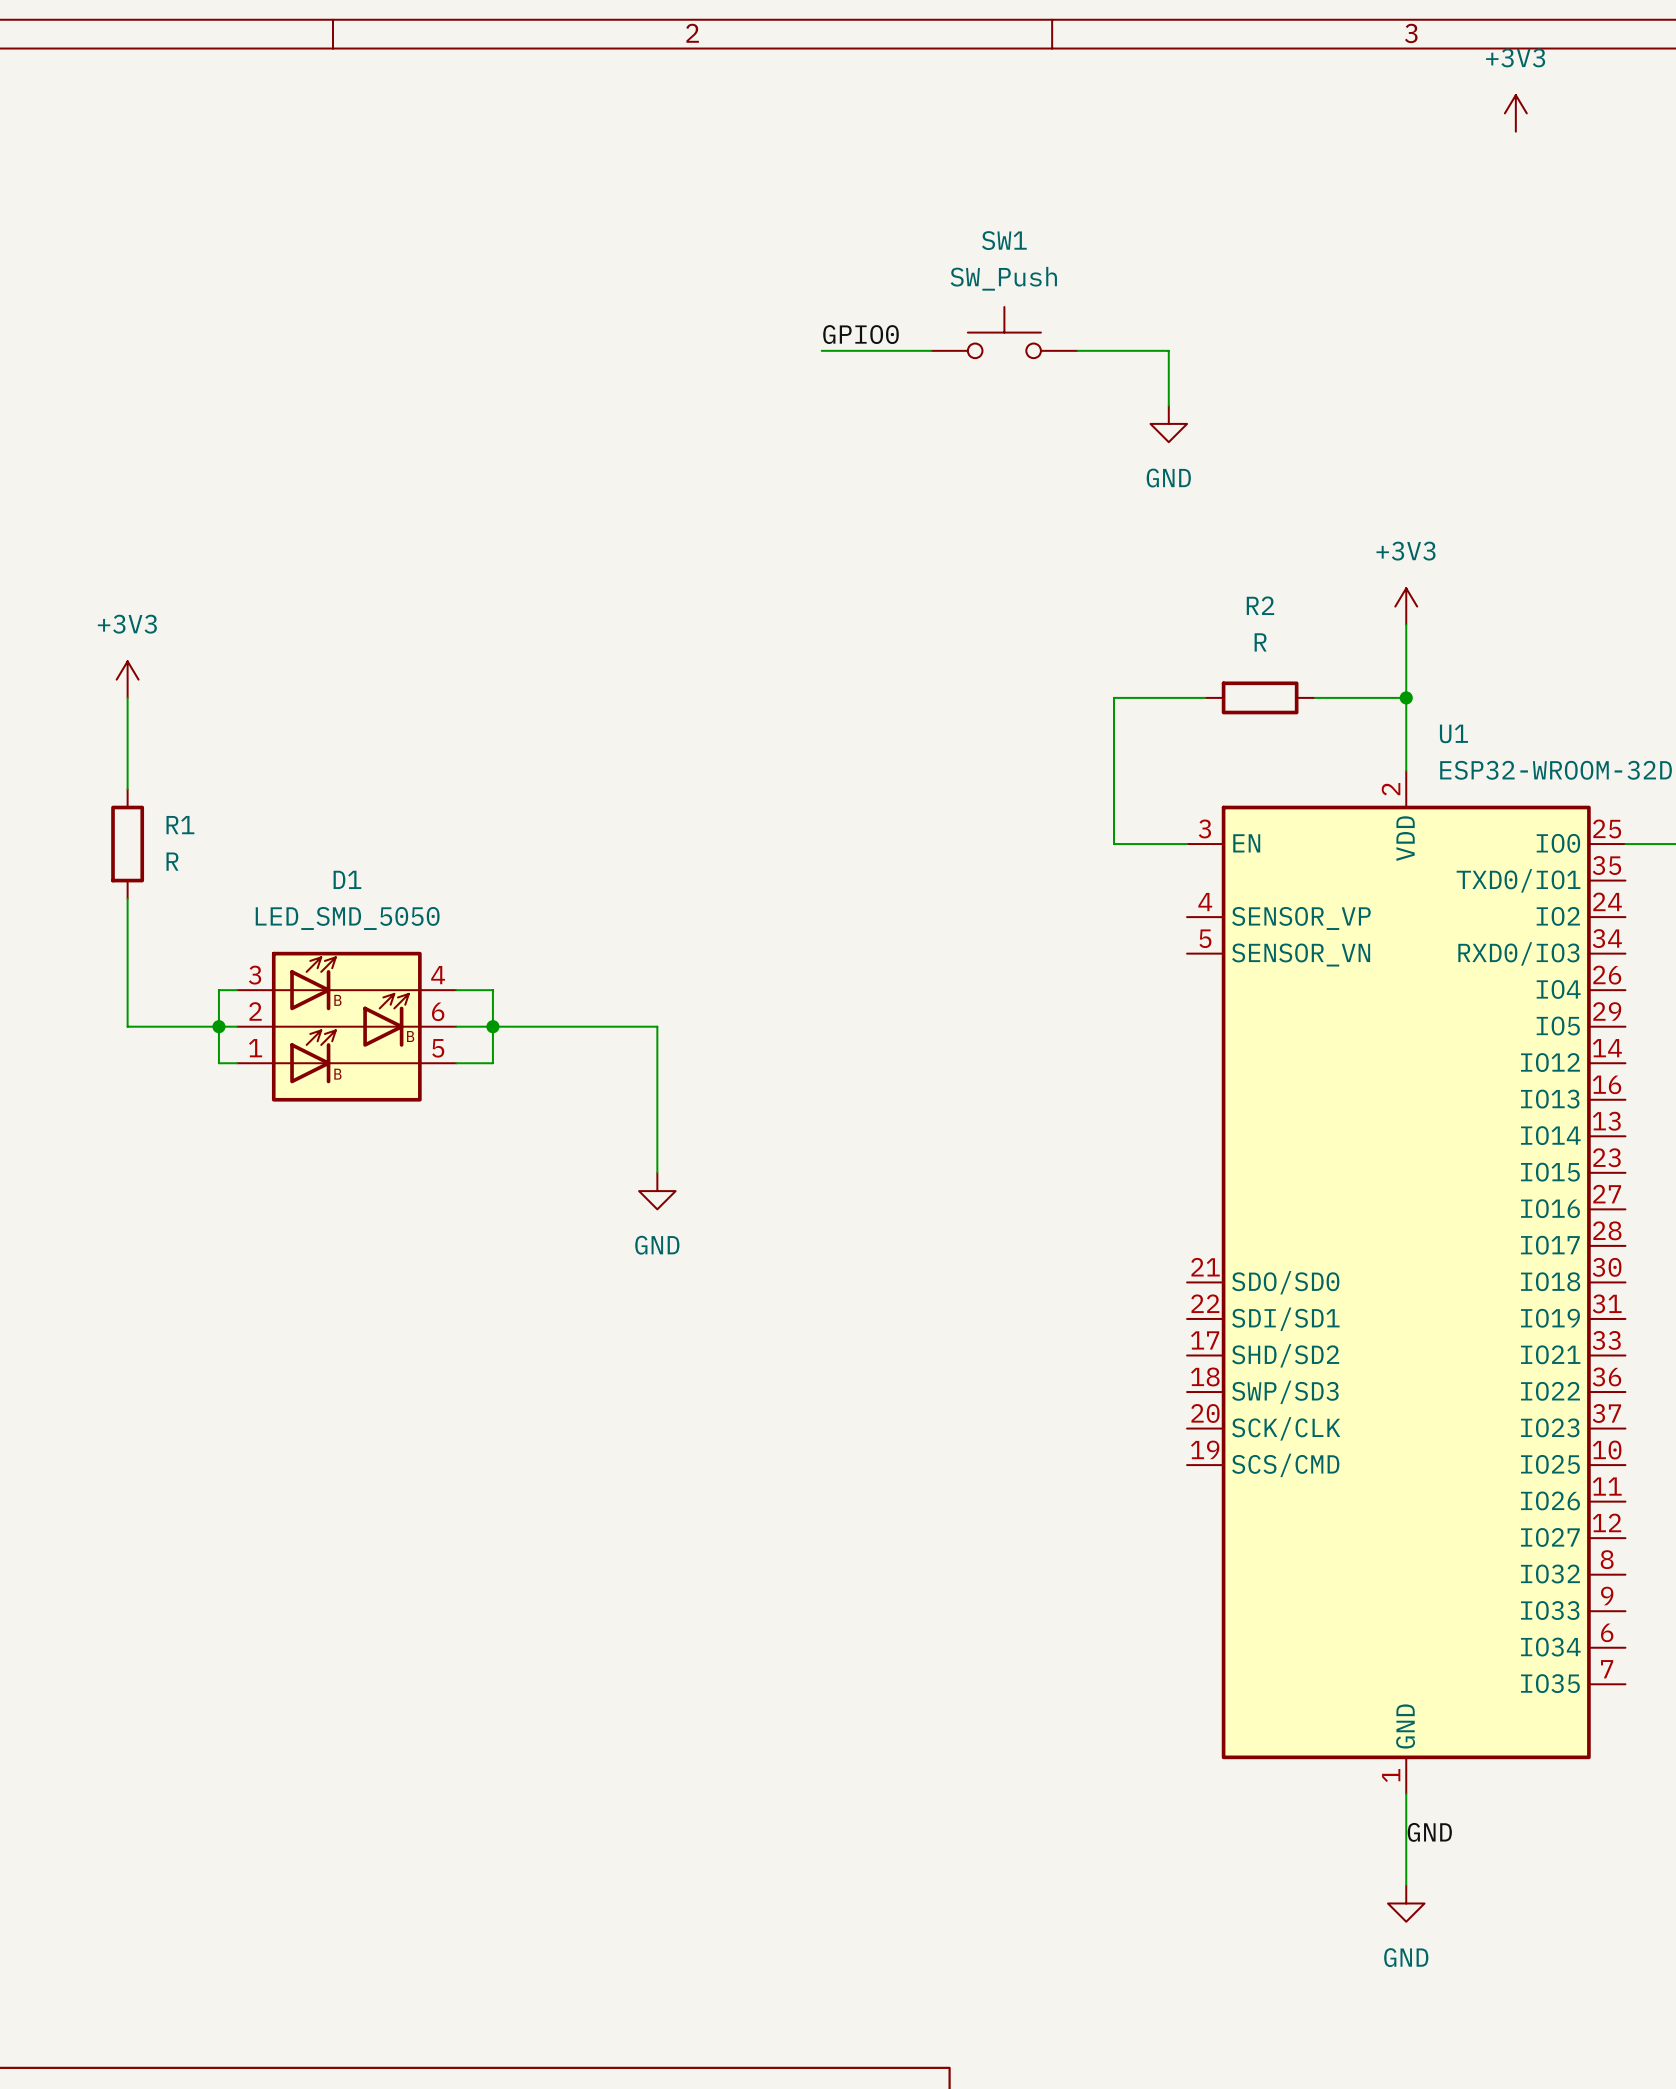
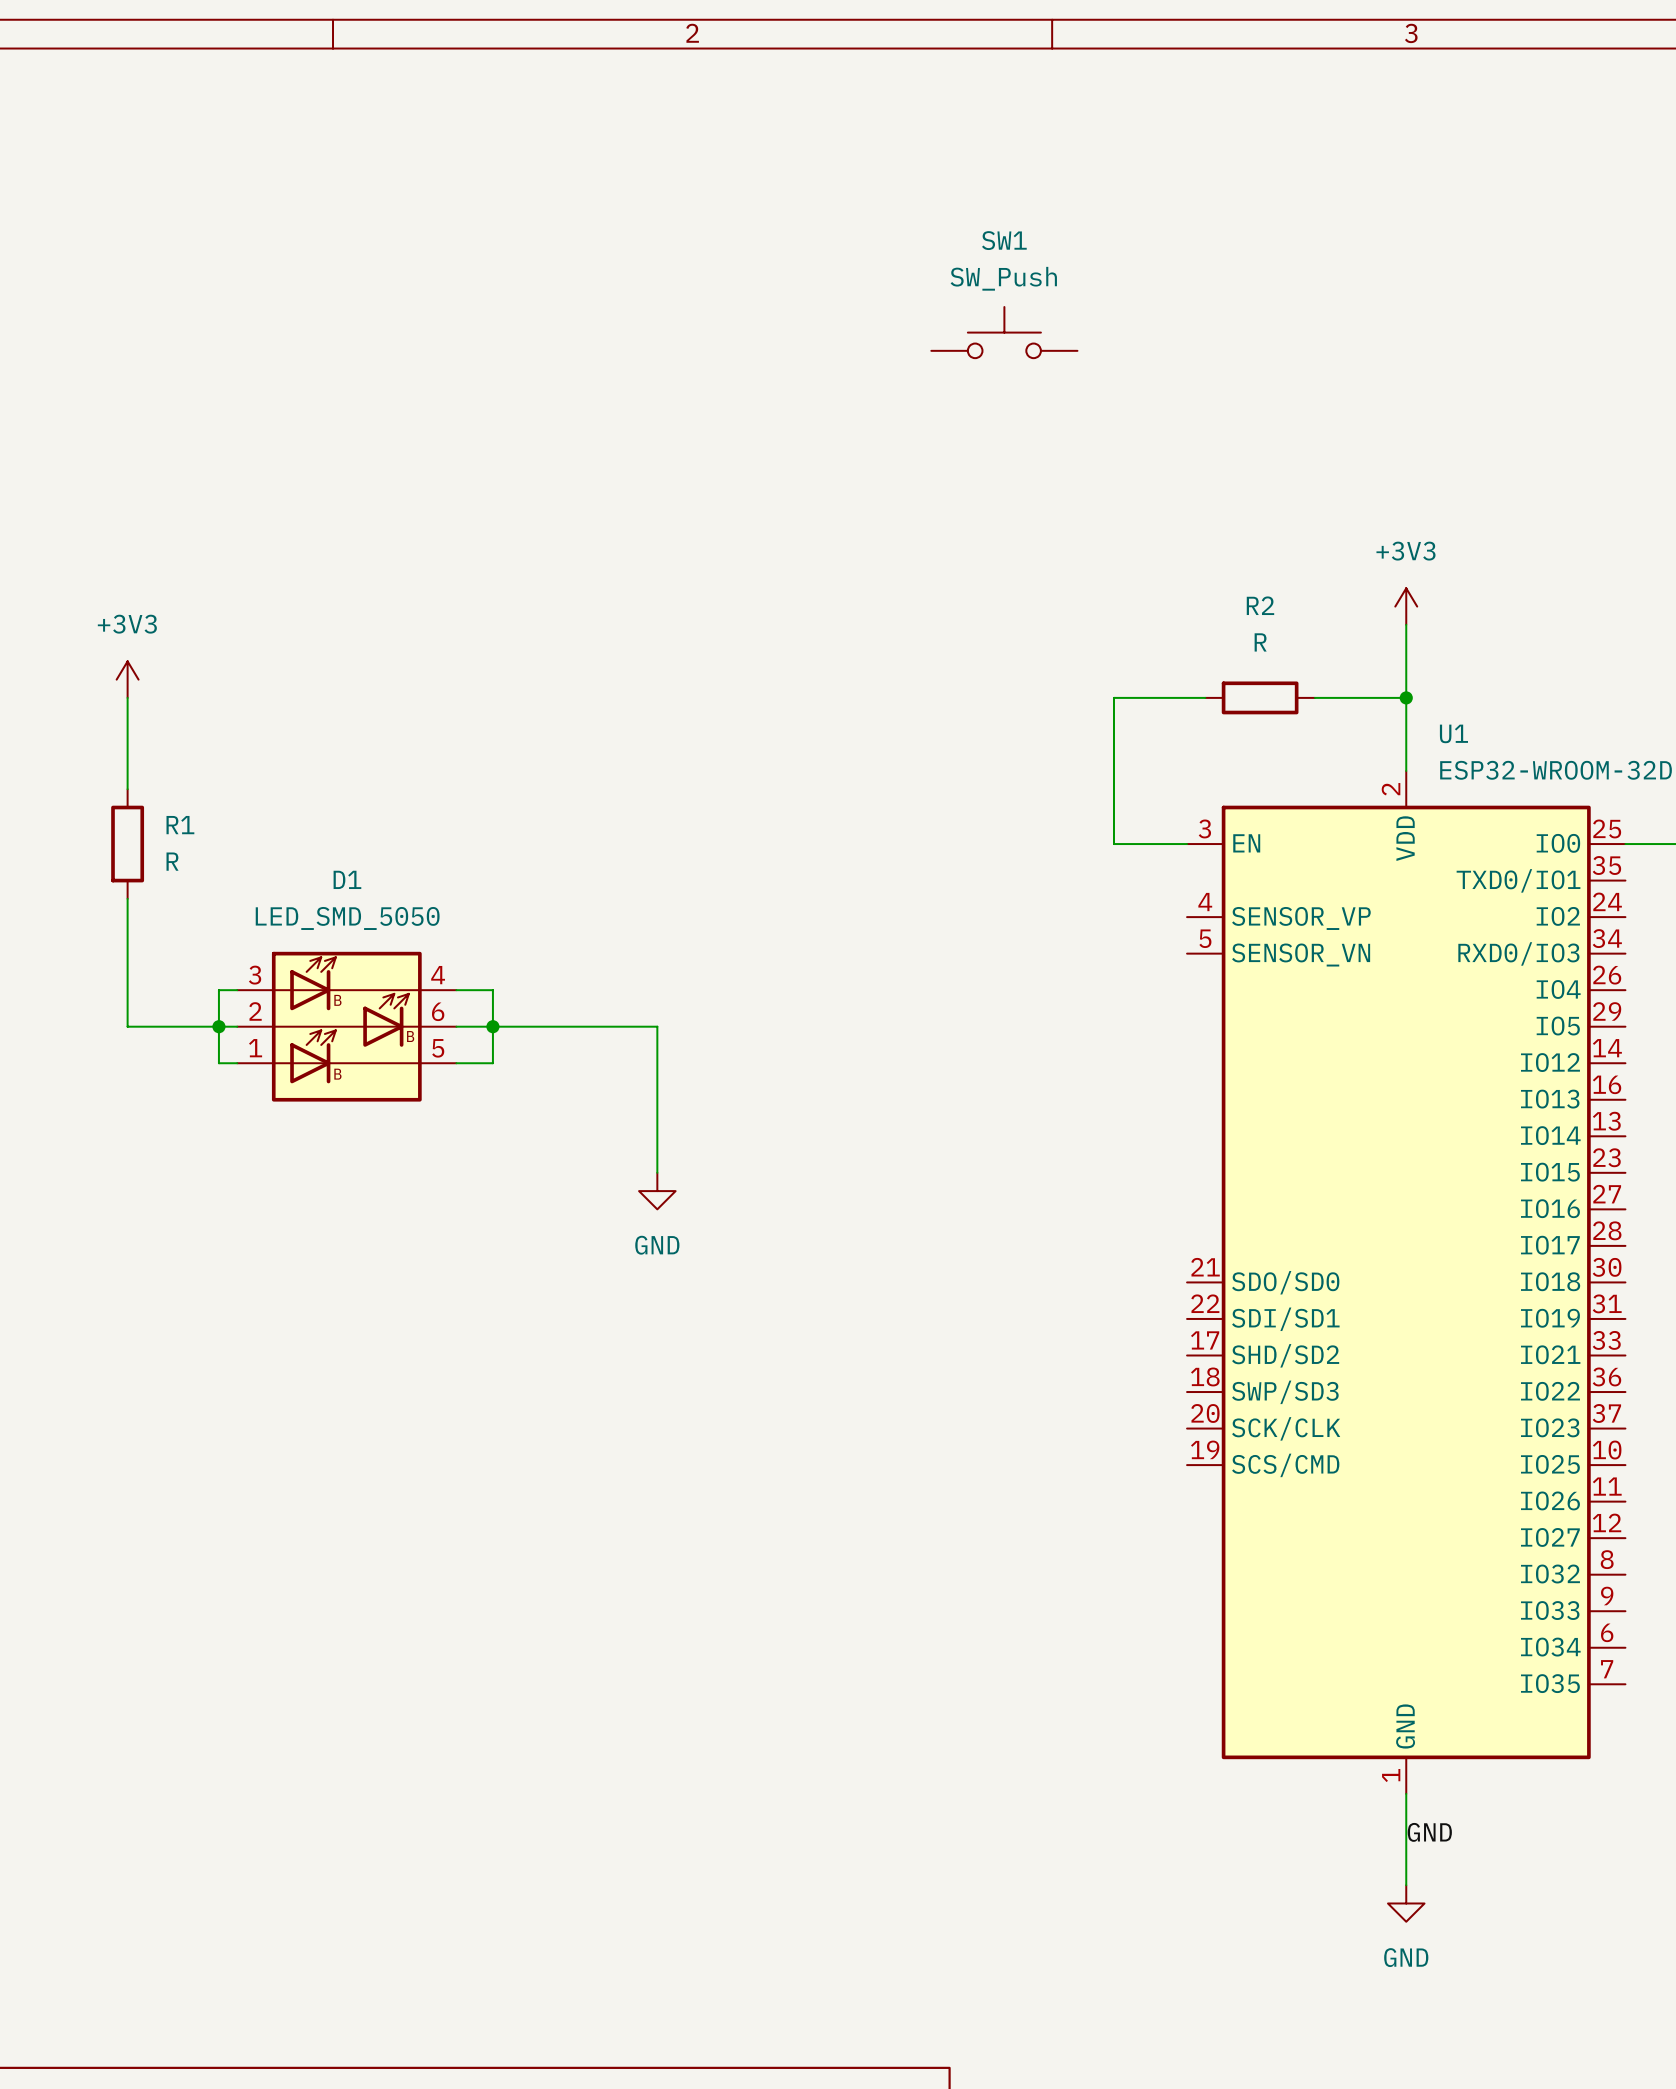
power symbol: +3V3 (1515, 113) -> none
label: GPIO0 (860, 334) -> none
wire: (821, 350) (931, 350) -> none
wire: (1077, 350) (1168, 350) (1168, 405) -> none
power symbol: GND (1168, 423) -> none

